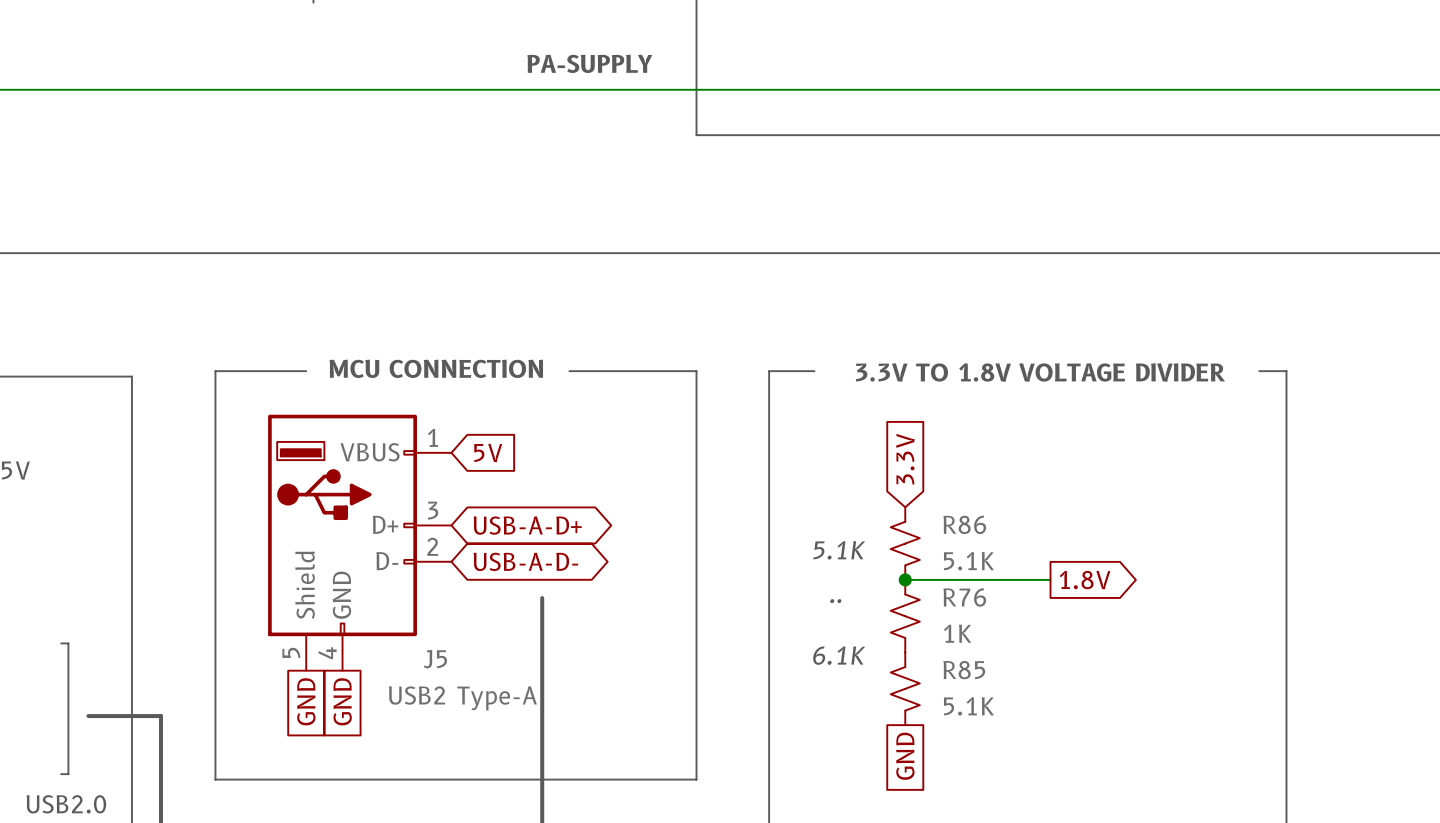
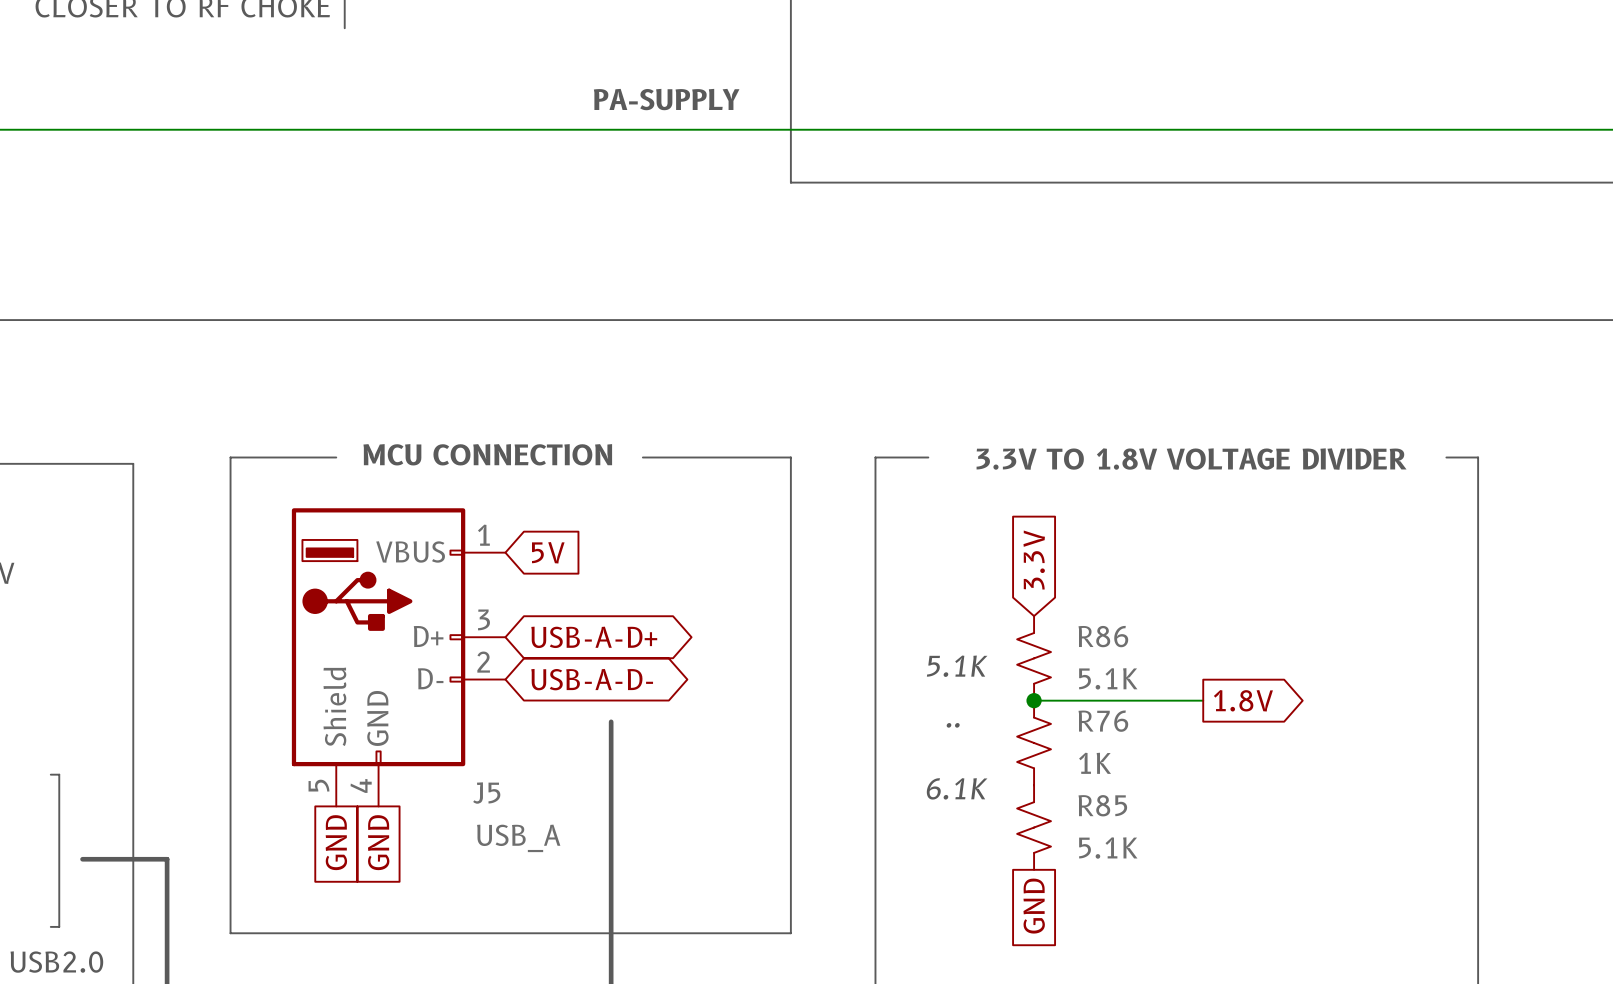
J5 value: USB2 Type-A (462, 698) -> USB_A (518, 838)

